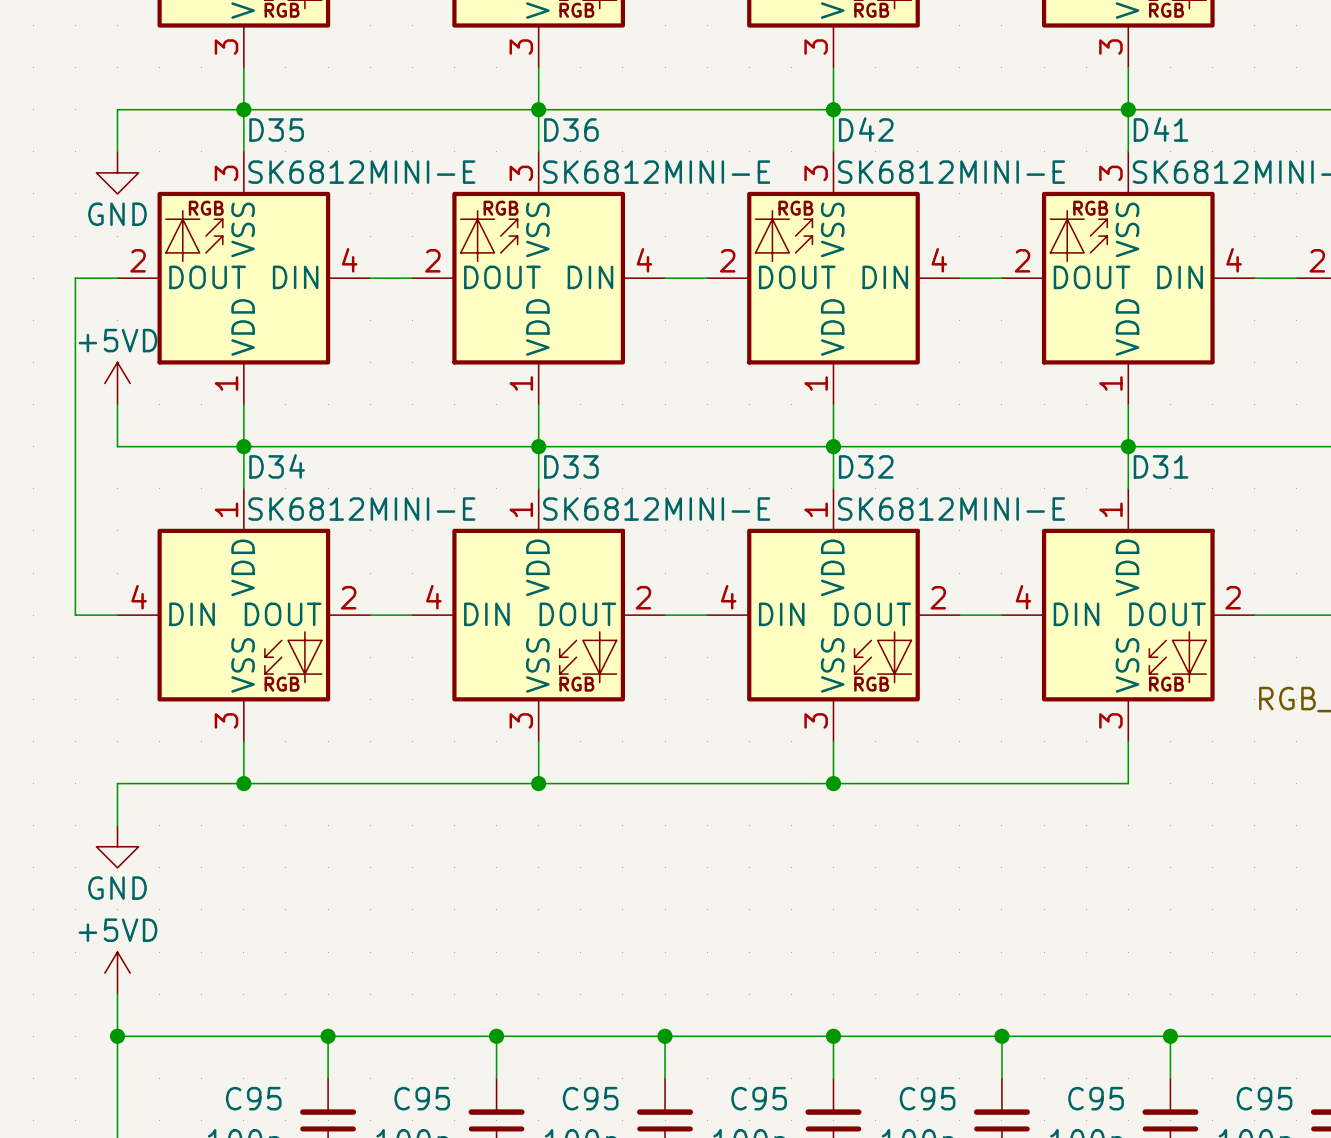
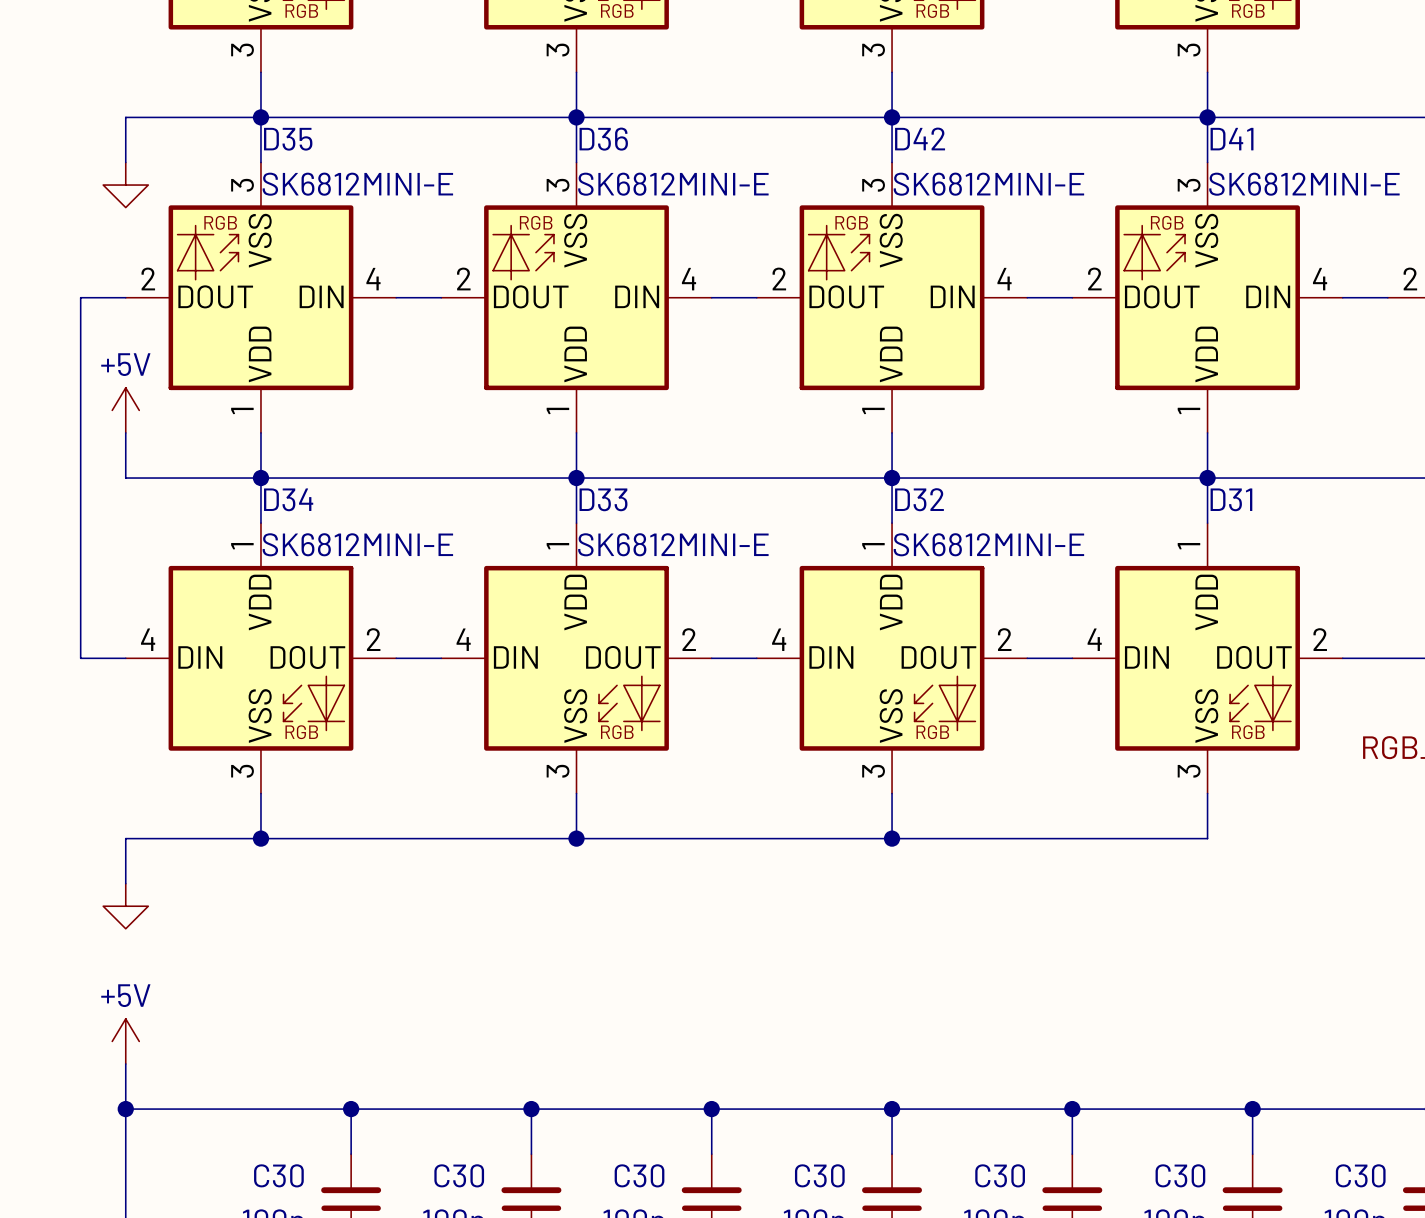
power symbol text: GND (117, 214) -> none
power symbol: +5VD (117, 383) -> +5V (125, 410)
power symbol text: GND (117, 888) -> none
power symbol: +5VD (117, 973) -> +5V (125, 1041)
C95 name: C95 (253, 1098) -> C30 (278, 1175)
C95 name: C95 (422, 1098) -> C30 (459, 1175)
C95 name: C95 (590, 1098) -> C30 (639, 1175)
C95 name: C95 (759, 1098) -> C30 (819, 1175)
C95 name: C95 (927, 1098) -> C30 (1000, 1175)
C95 name: C95 (1096, 1098) -> C30 (1180, 1175)
C95 name: C95 (1264, 1098) -> C30 (1360, 1175)

